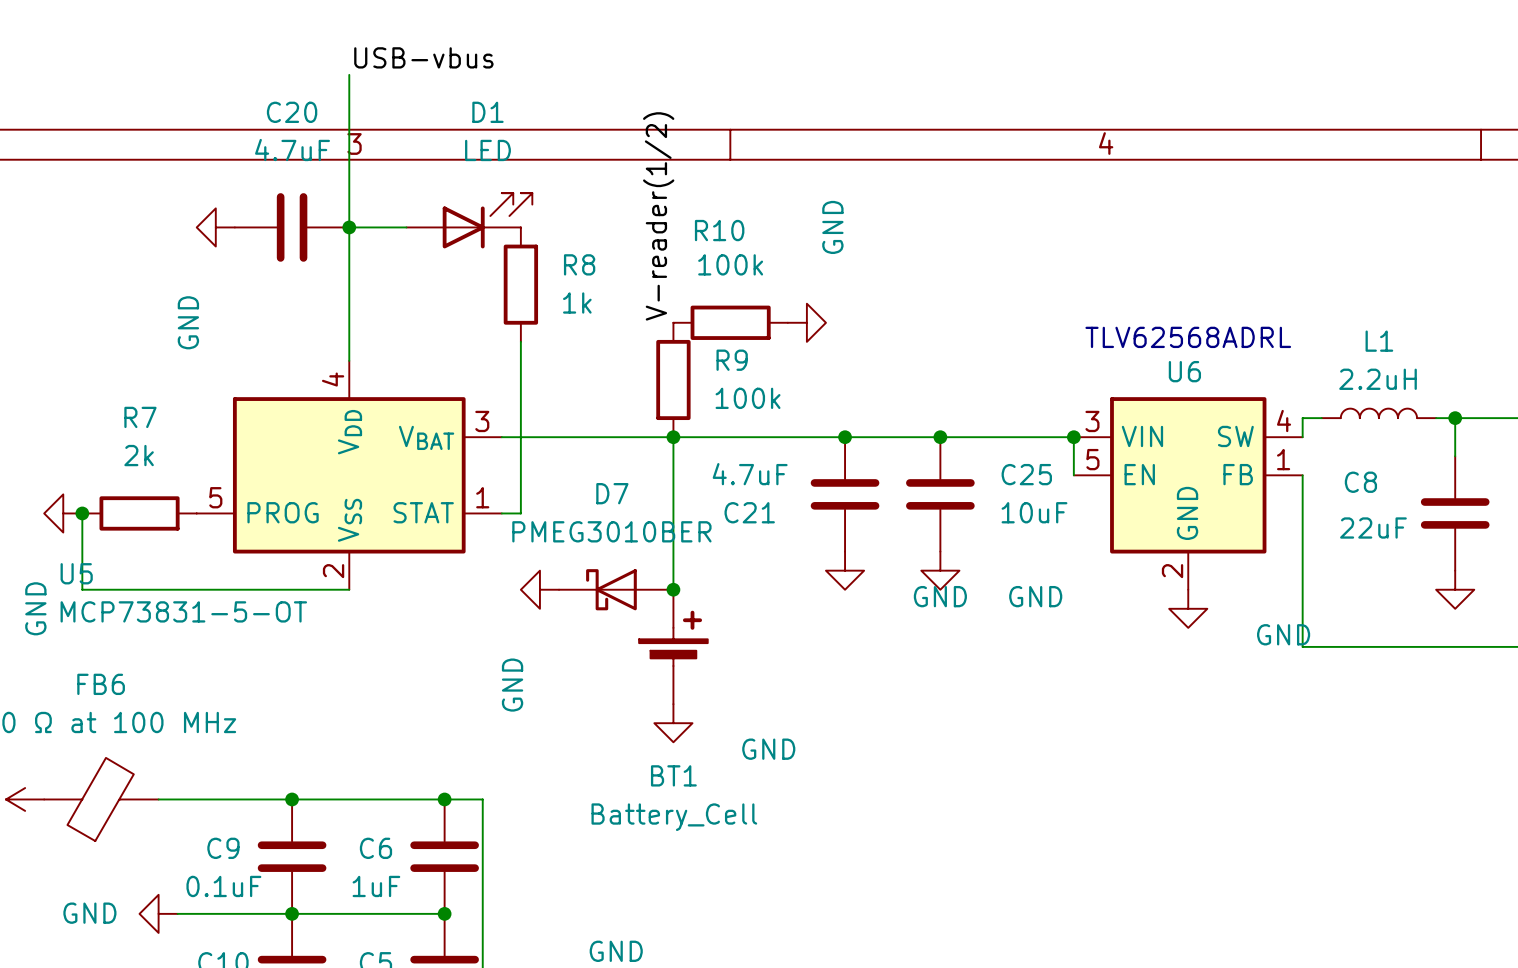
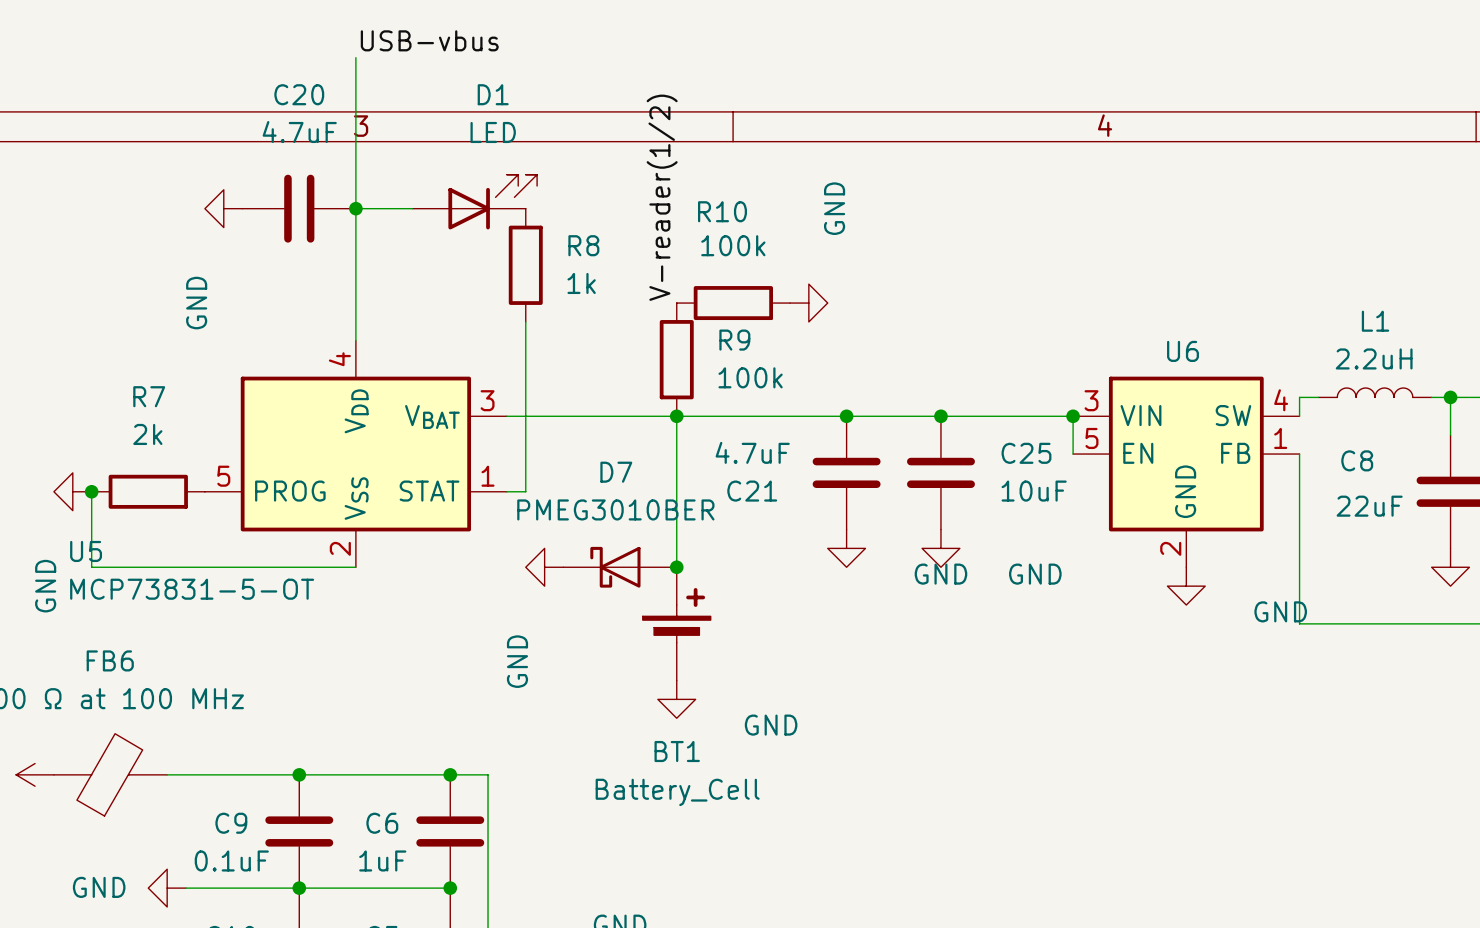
text: TLV62568ADRL (1188, 337) -> none

